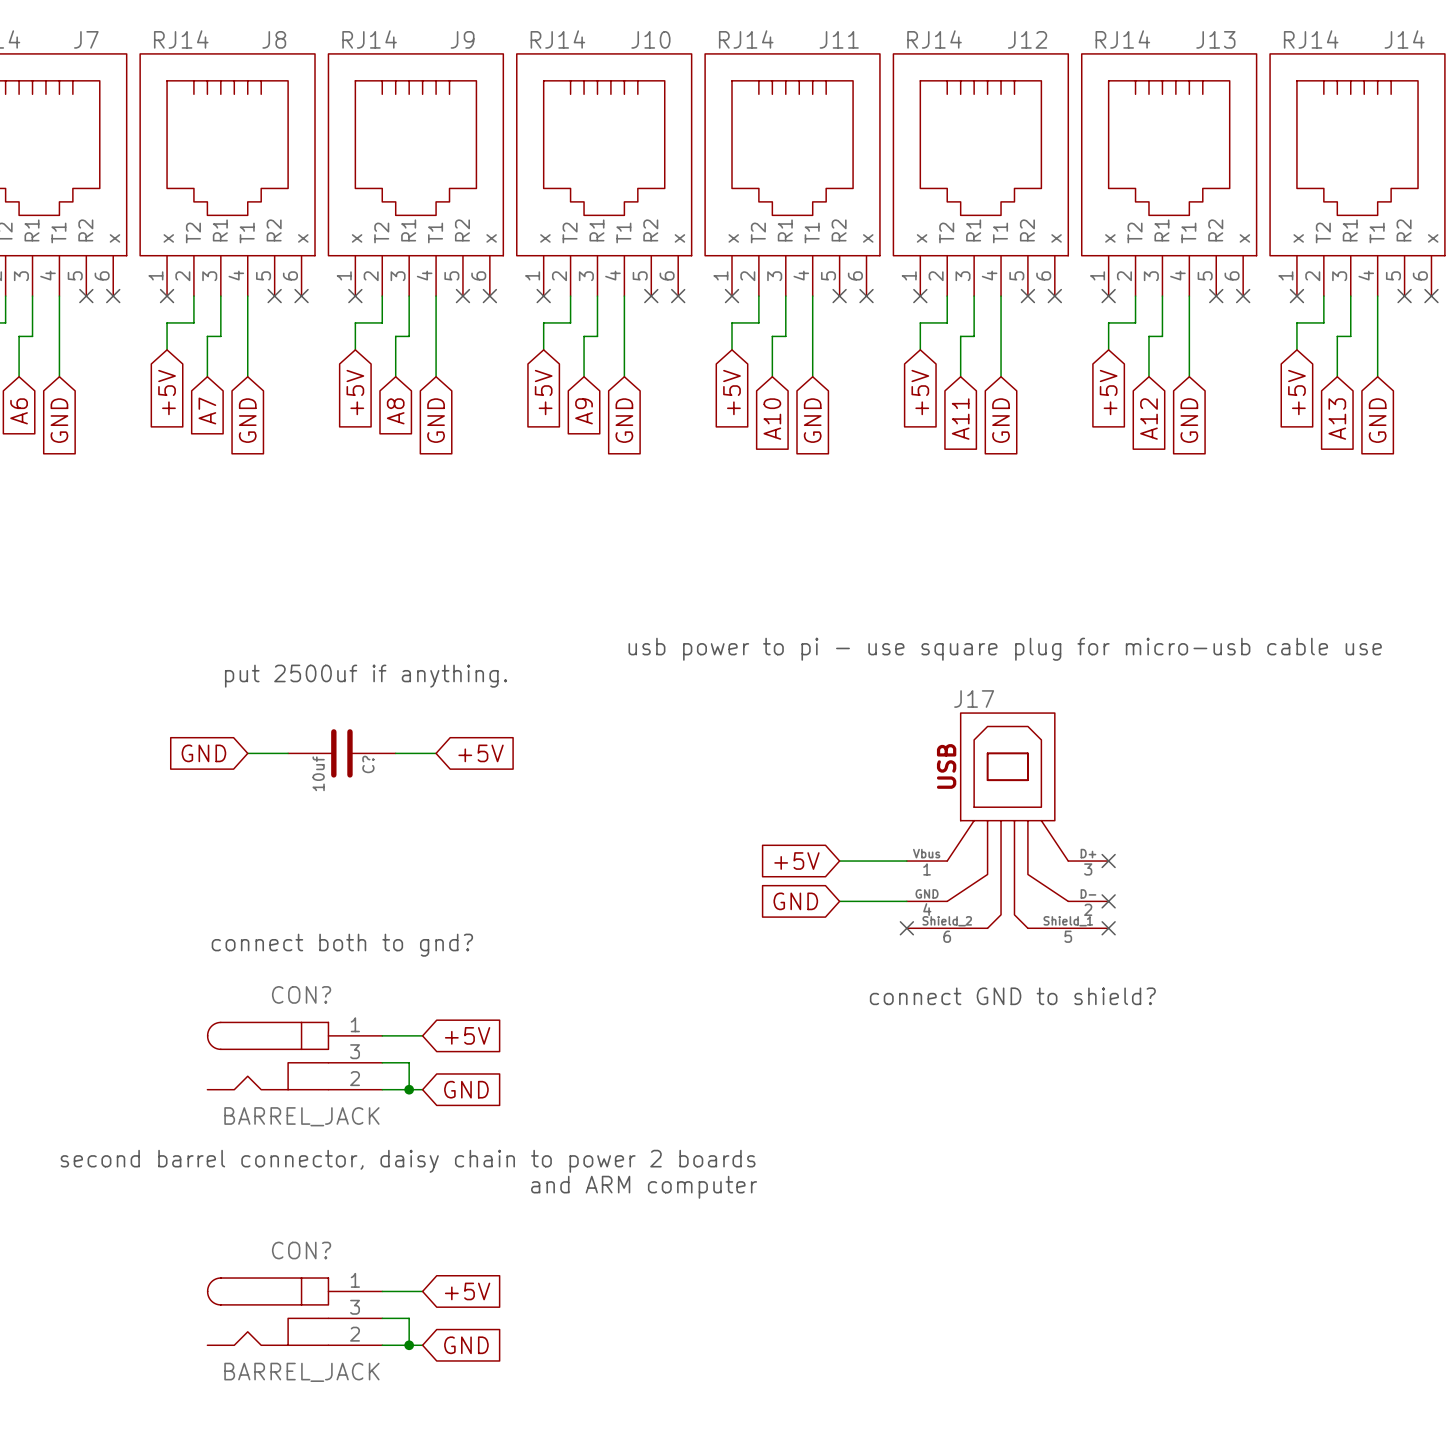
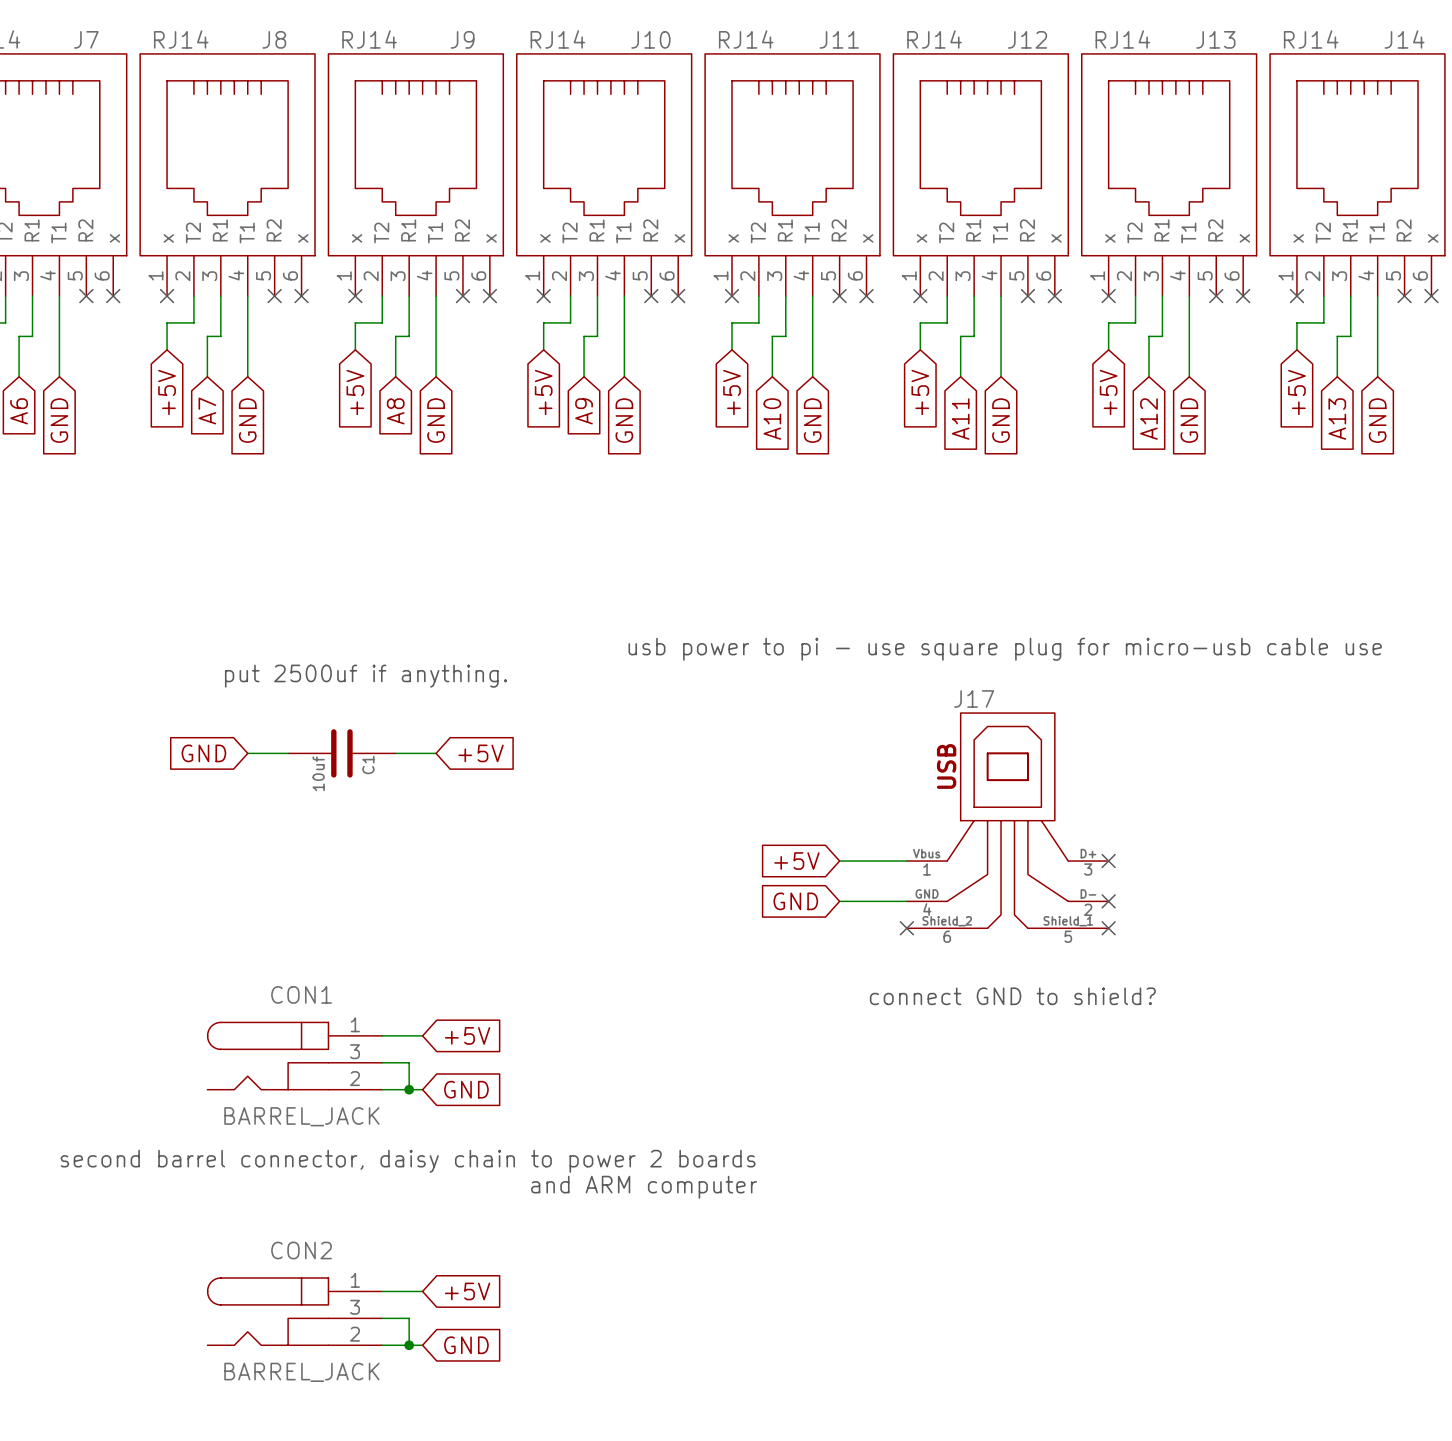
C? name: C? (368, 764) -> C1 (368, 764)
text: connect both to gnd? (342, 945) -> none
CON? name: CON? (301, 994) -> CON1 (301, 994)
CON? name: CON? (301, 1250) -> CON2 (301, 1250)

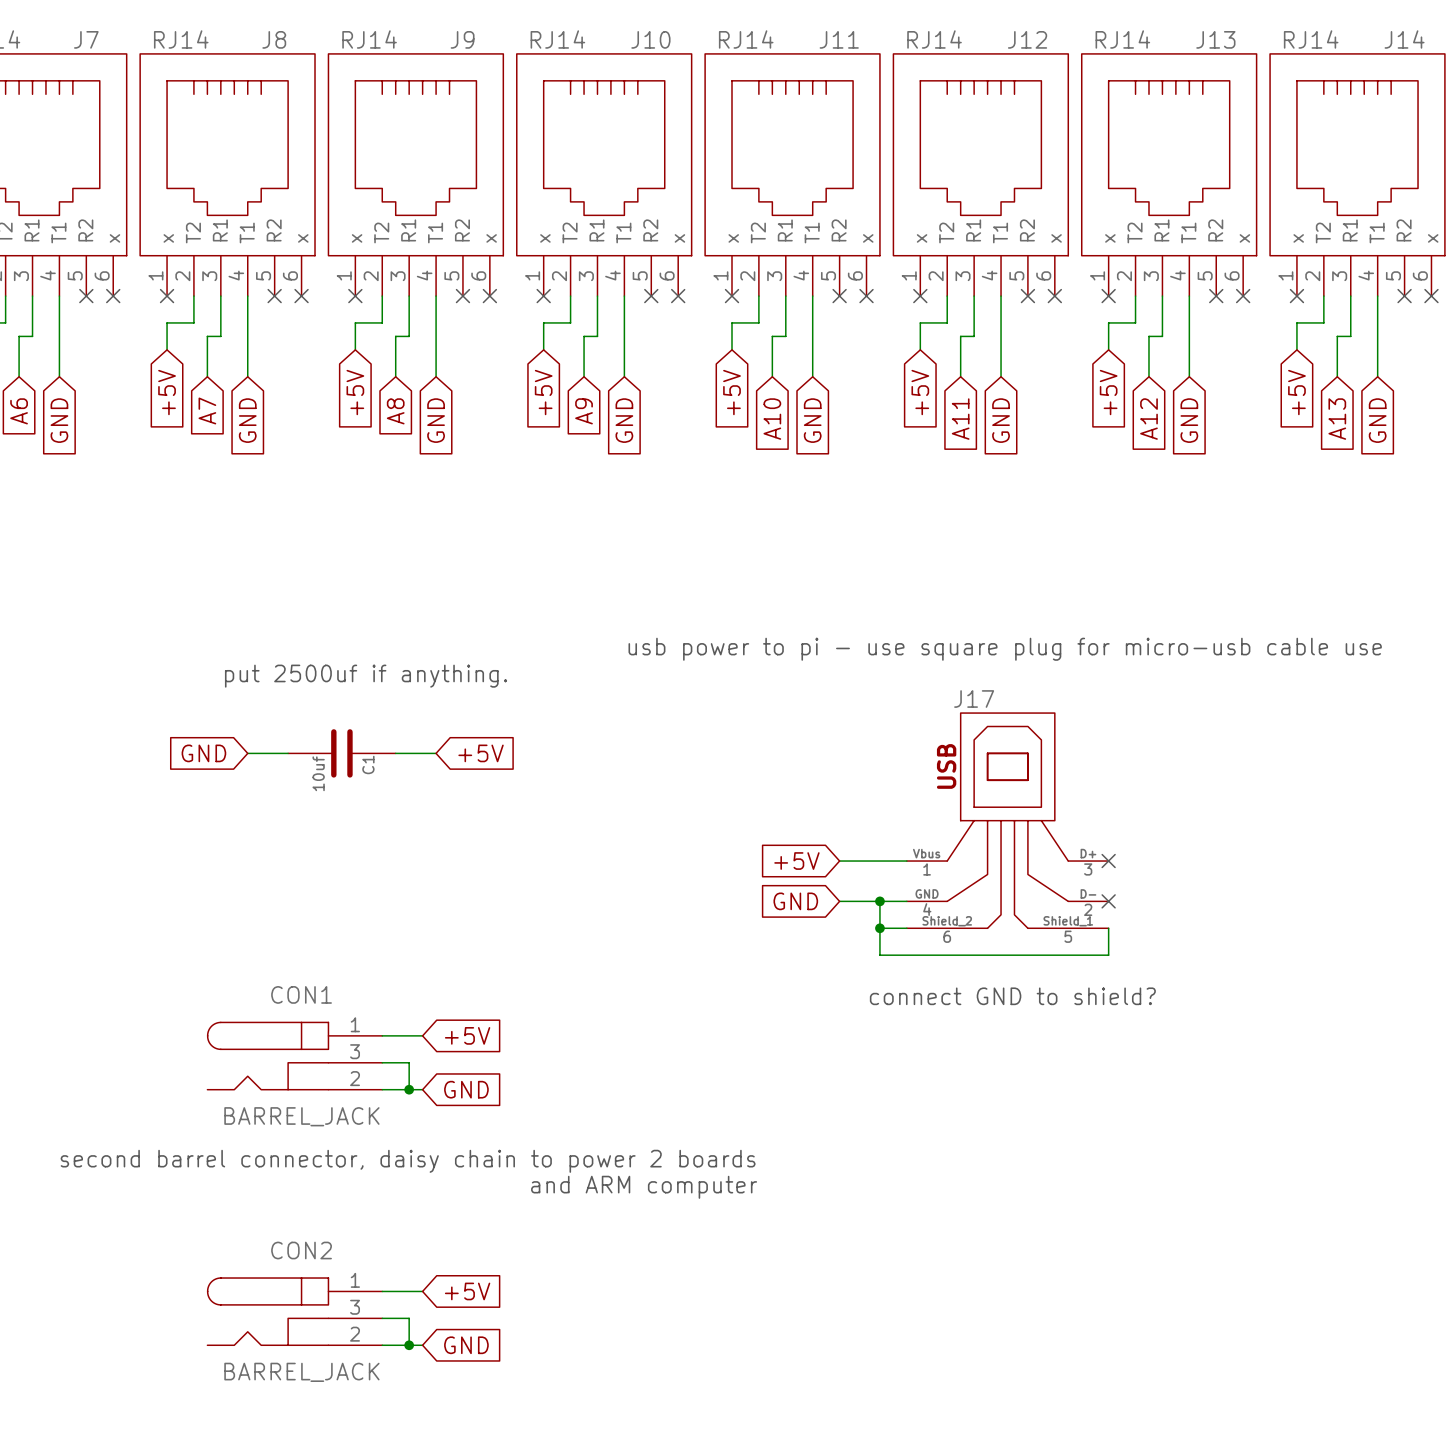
wire: none -> (879, 901) (879, 955) (1108, 955) (1108, 928)
junction: none -> (879, 901)
wire: none -> (879, 928) (906, 928)
junction: none -> (879, 928)
no-connect mark: (906, 928) -> none
no-connect mark: (1108, 928) -> none

